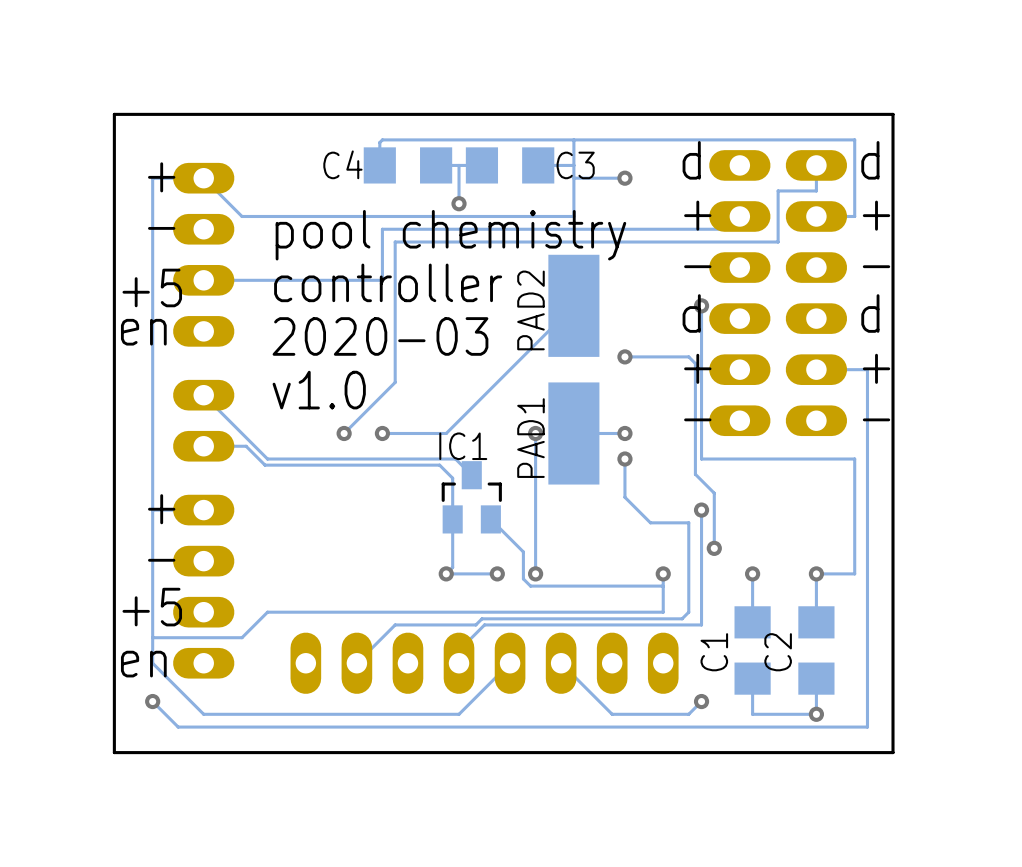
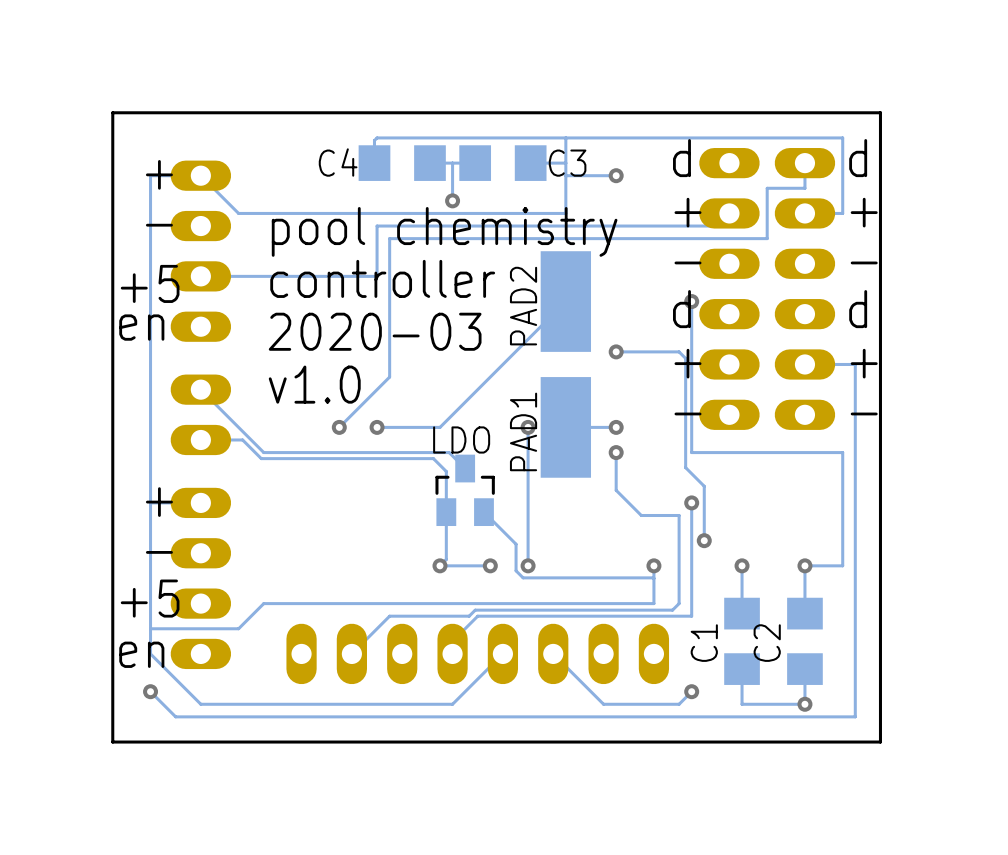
IC1 name: IC1 (463, 446) -> LDO (461, 439)

